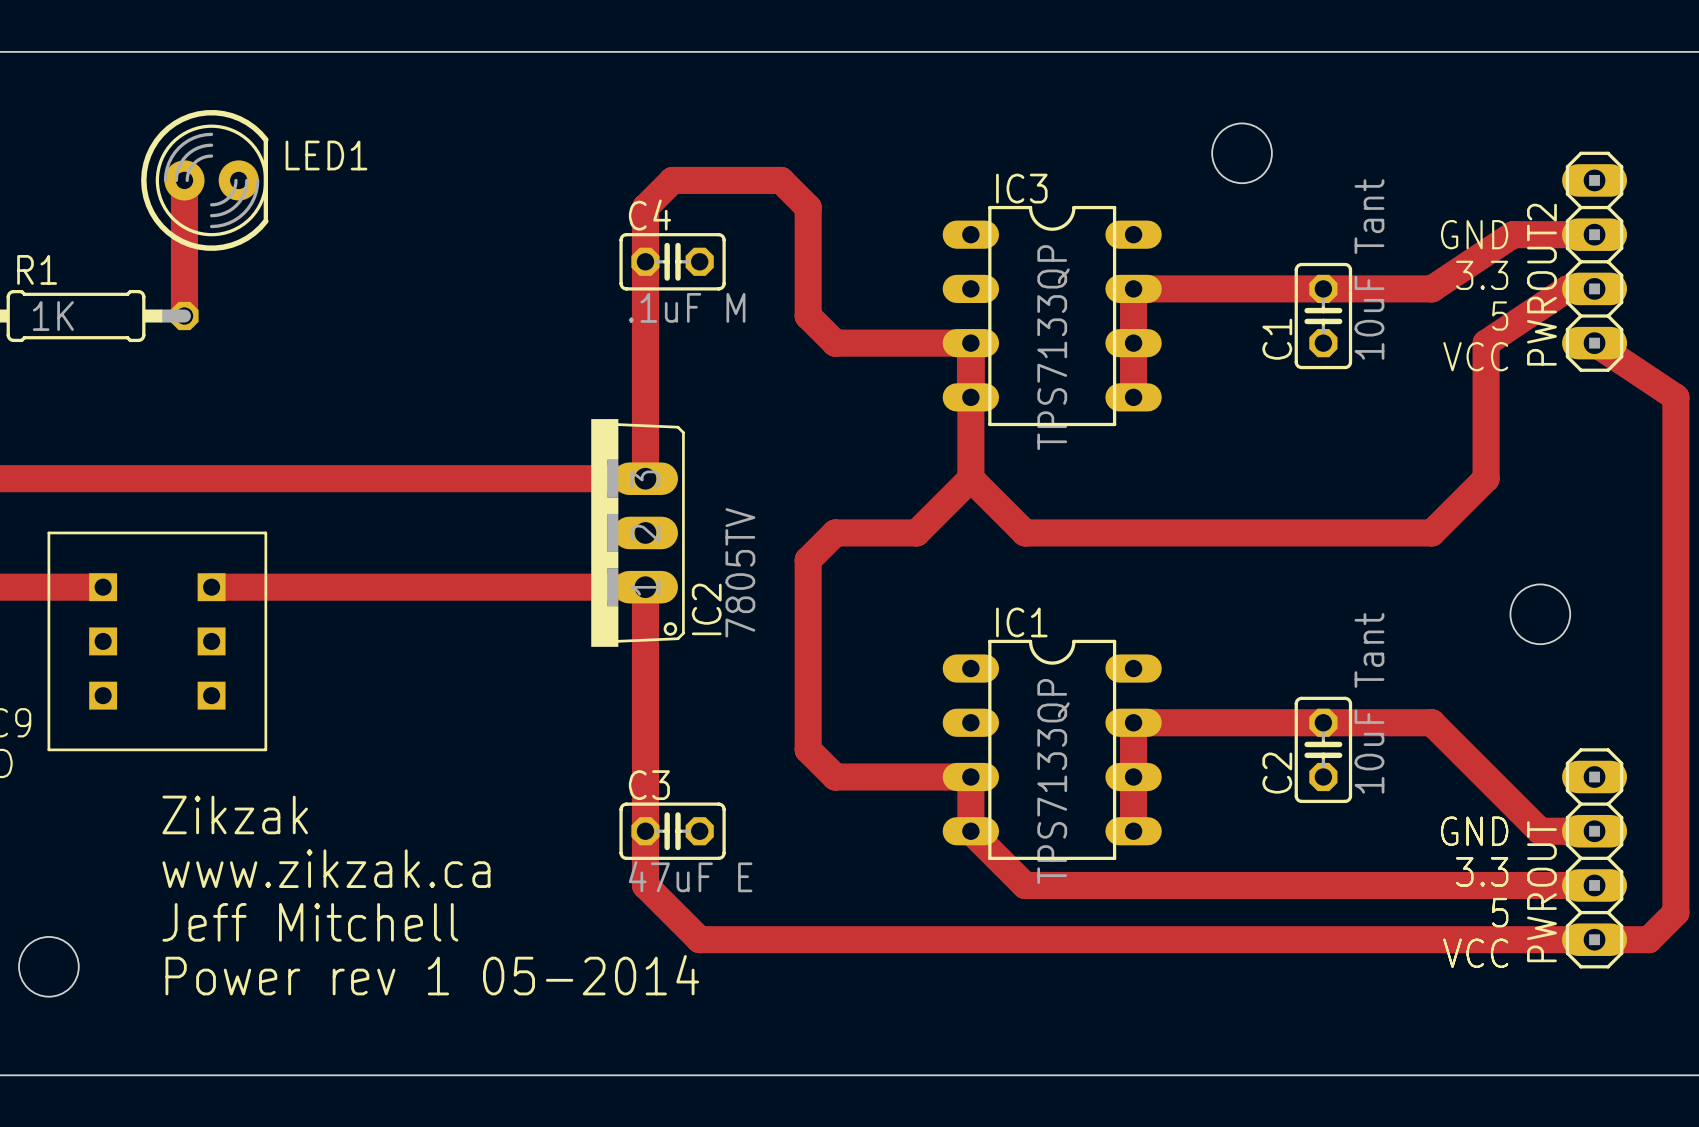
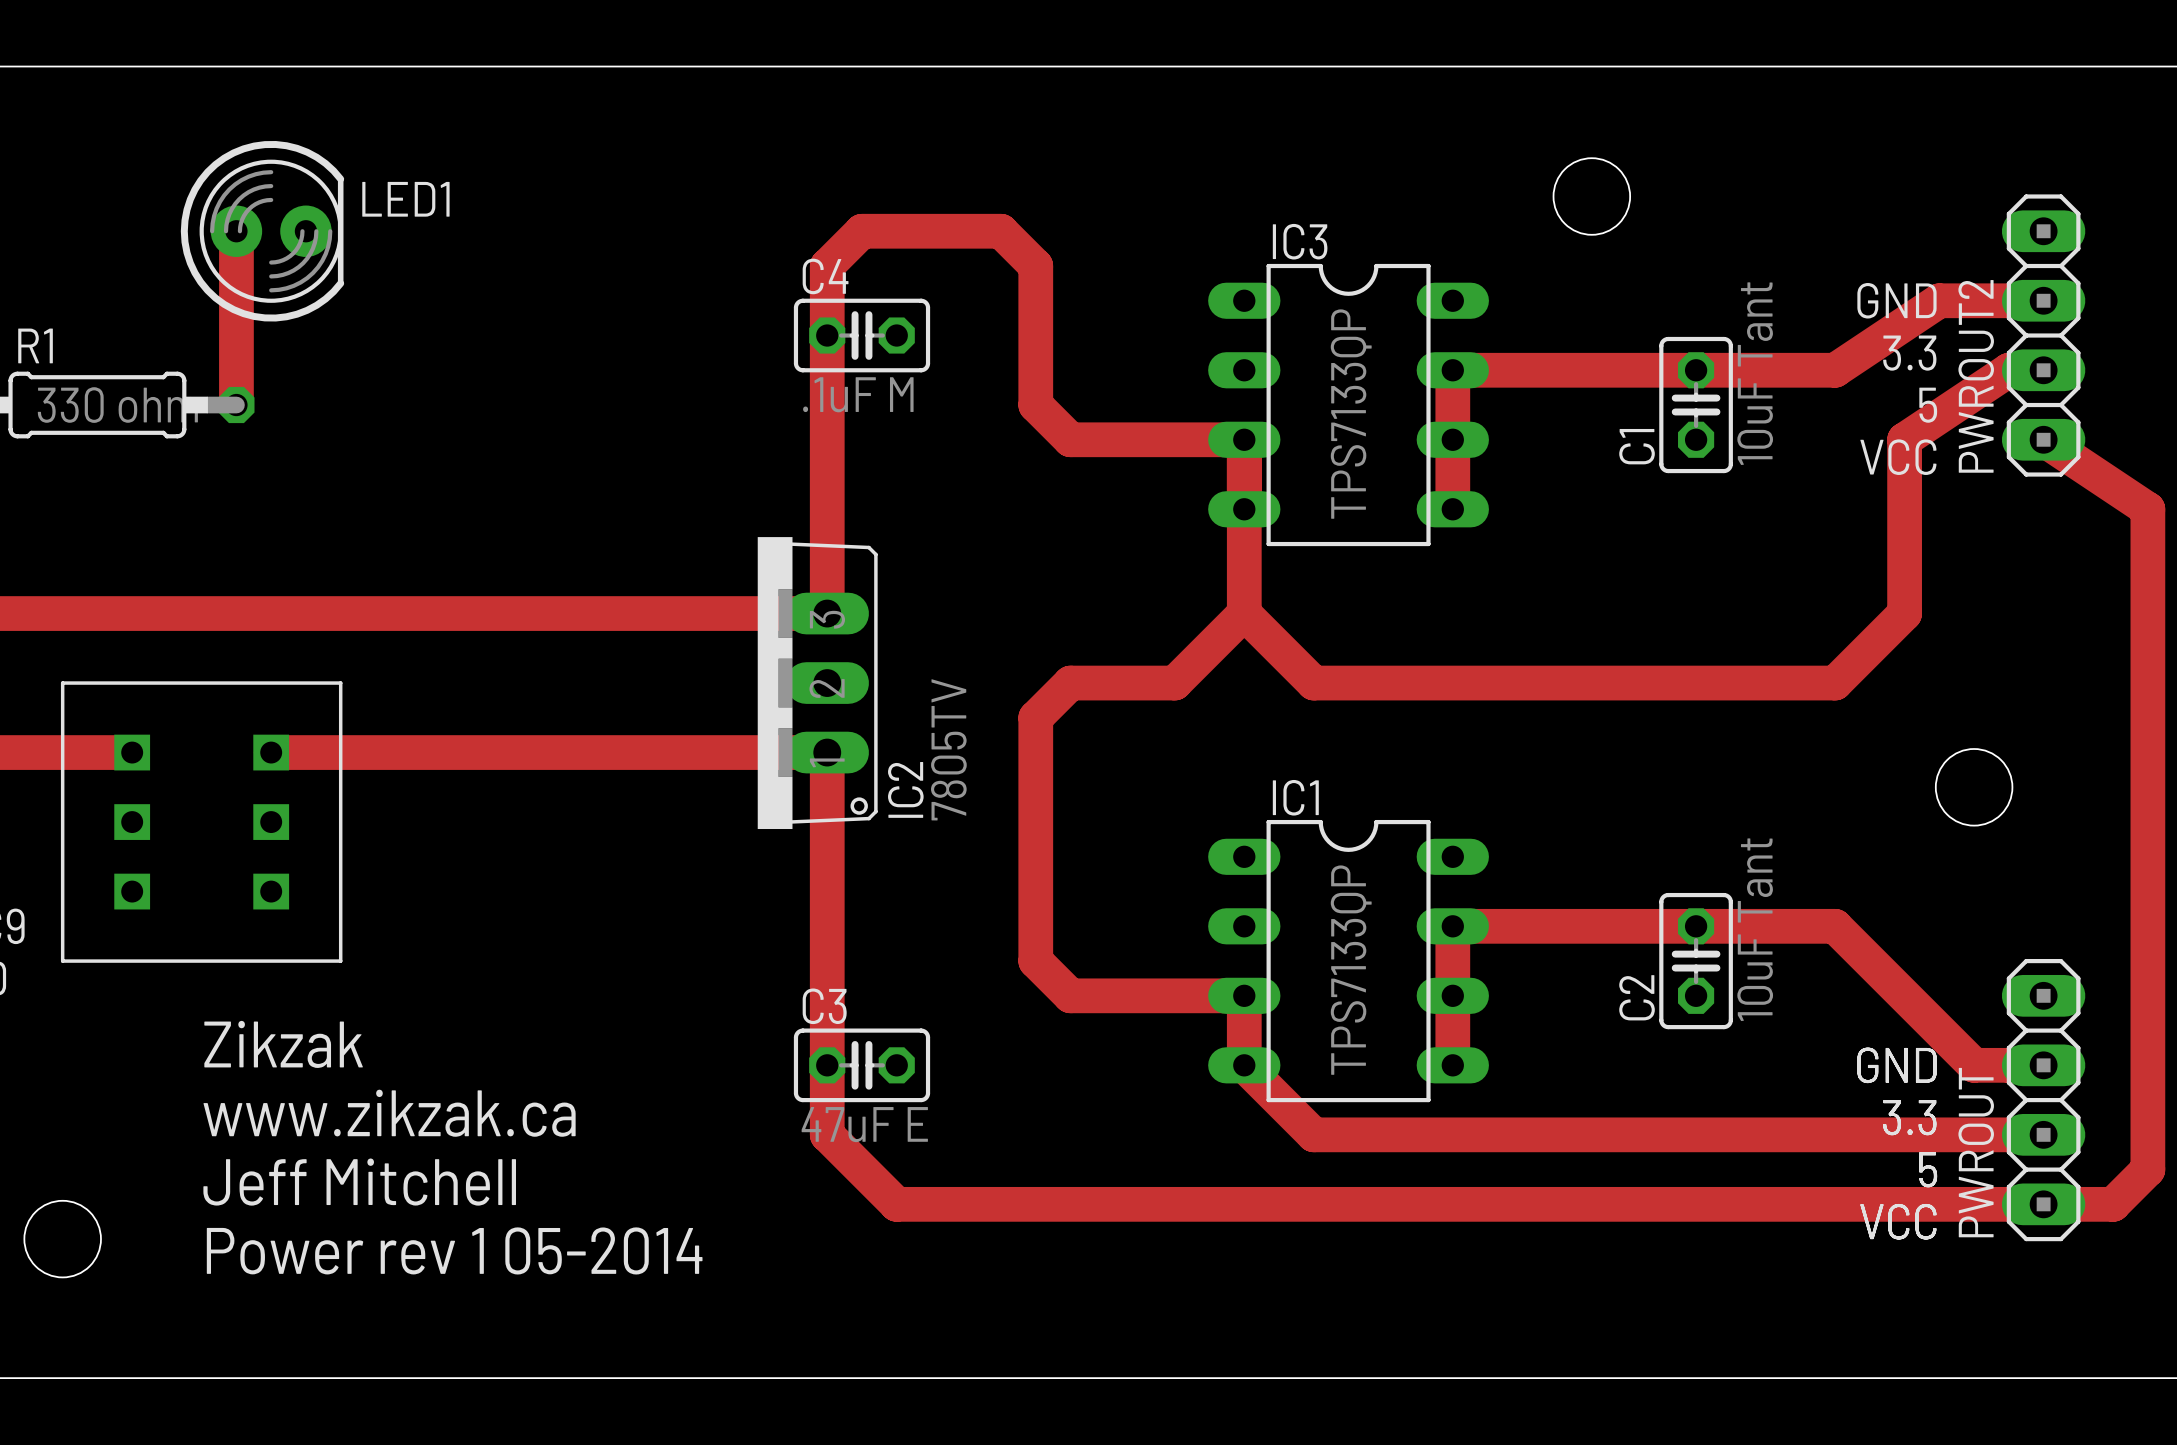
R1 value: 1K (53, 316) -> 330 ohm (117, 405)

